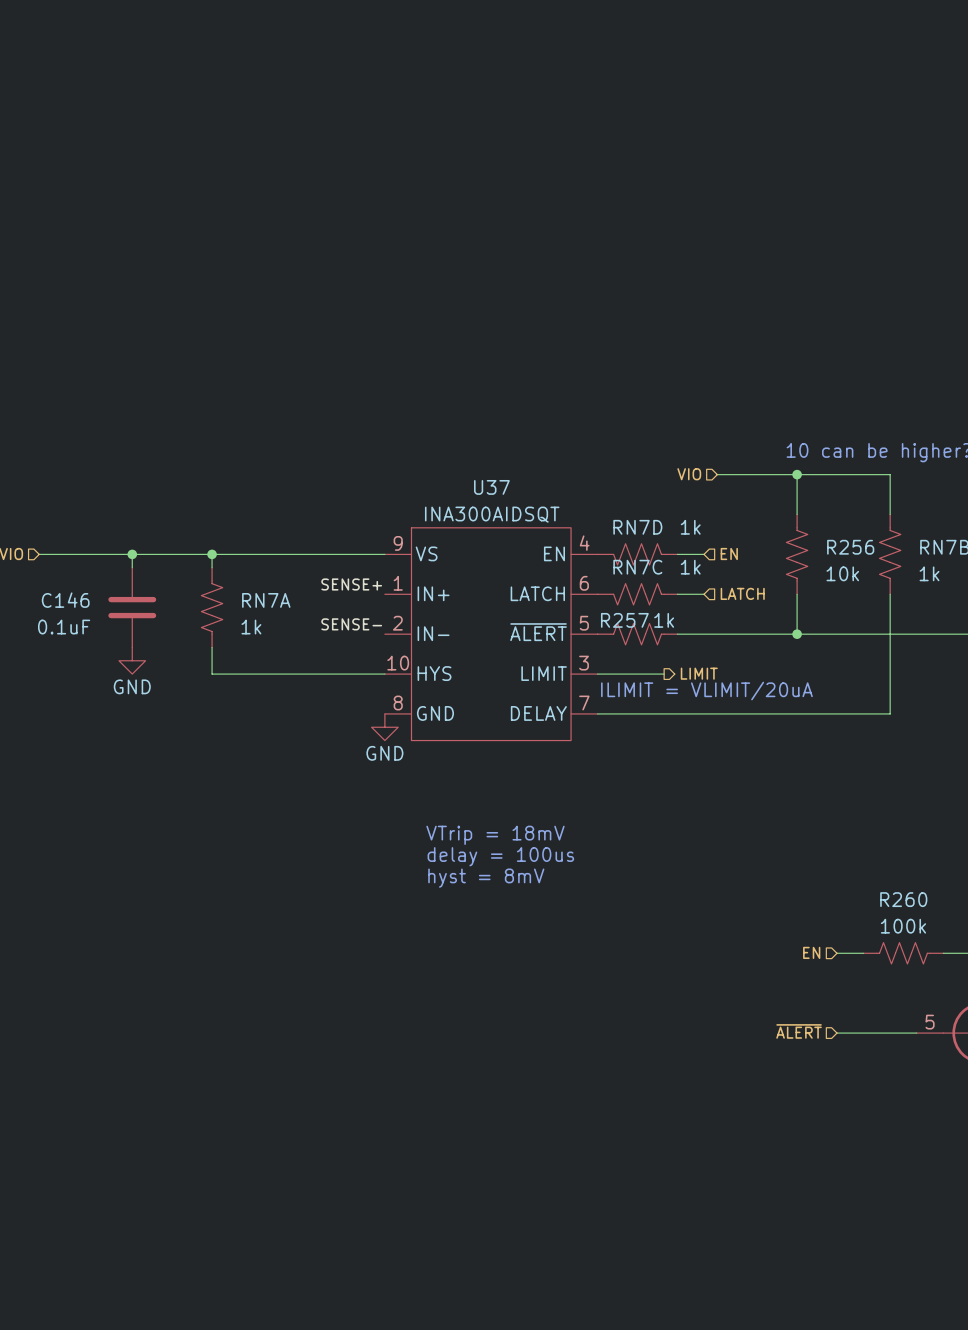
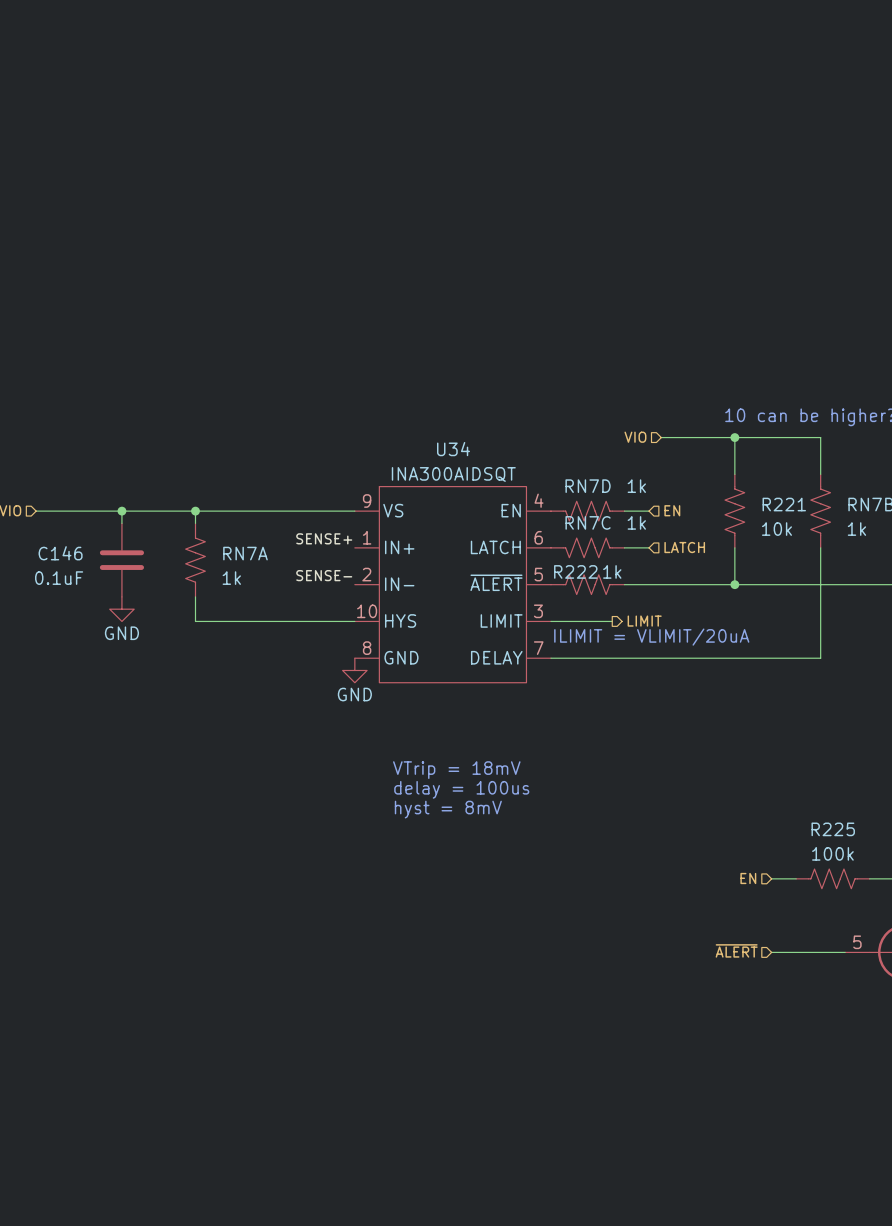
U37 name: U37 (491, 487) -> U34 (453, 449)
R256 name: R256 (850, 547) -> R221 (784, 504)
R257 name: R257 (624, 620) -> R222 (575, 571)
R260 name: R260 (903, 899) -> R225 (833, 829)

